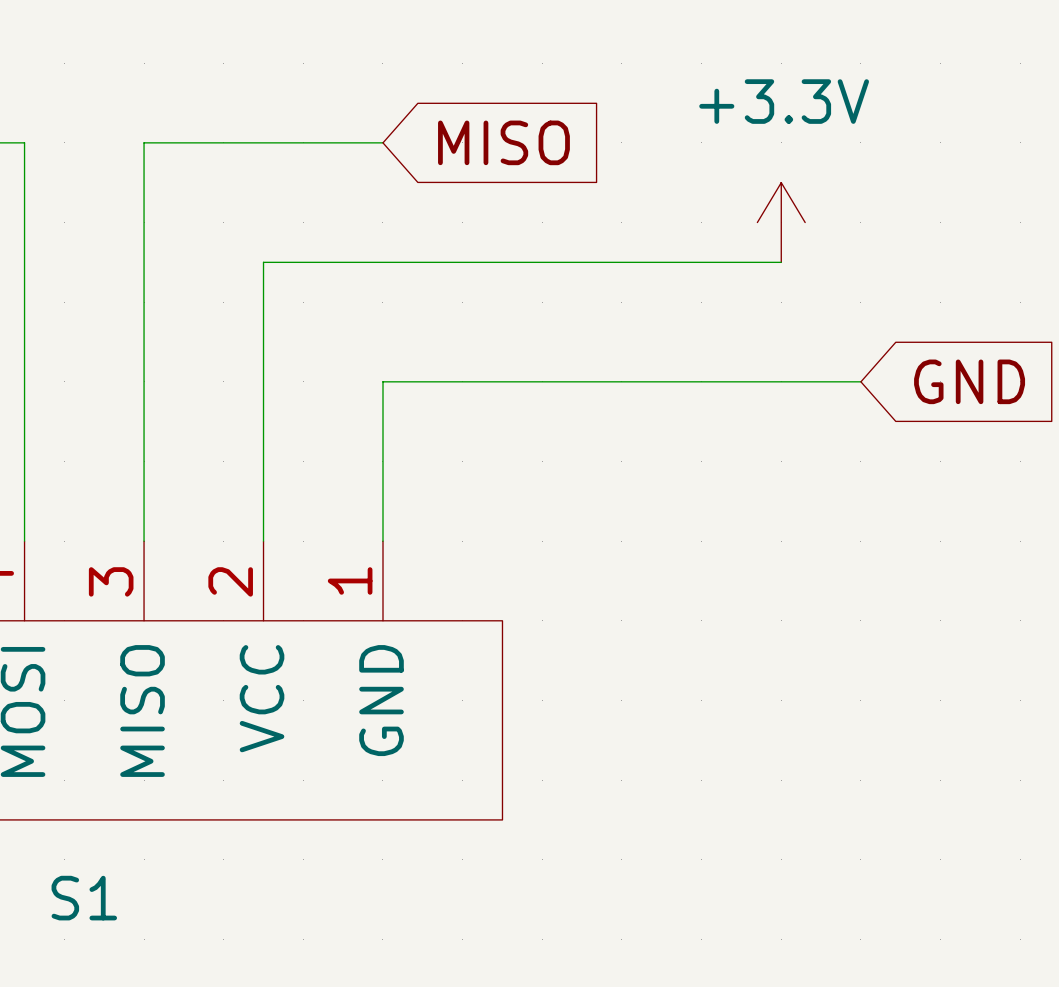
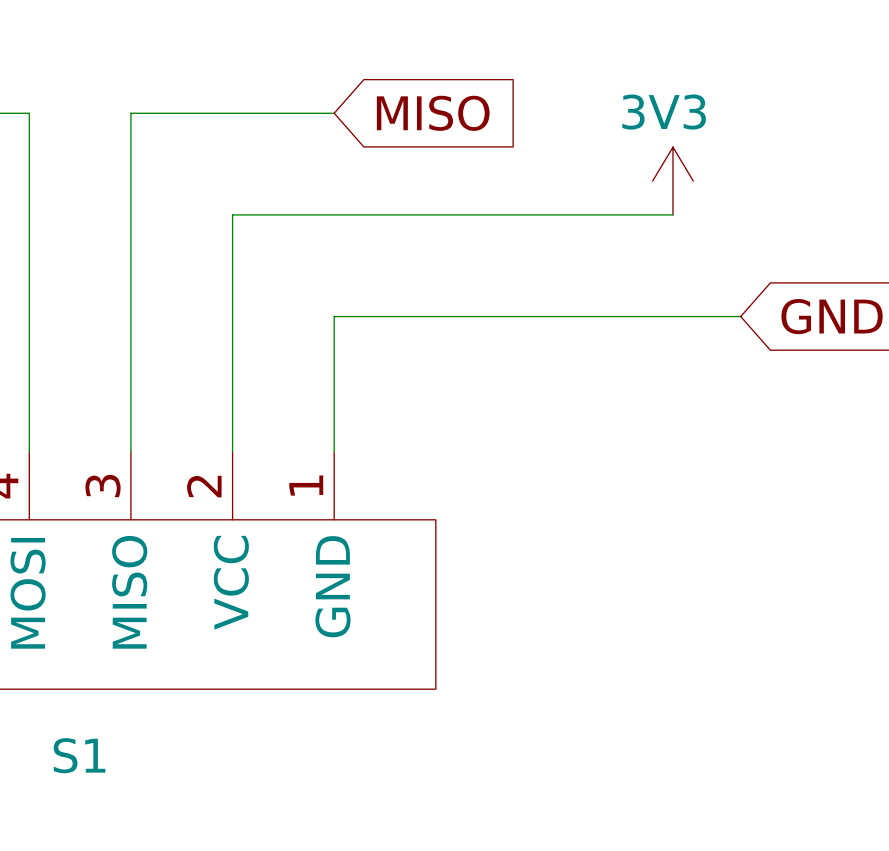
power symbol: +3.3V (781, 222) -> 3V3 (672, 181)

